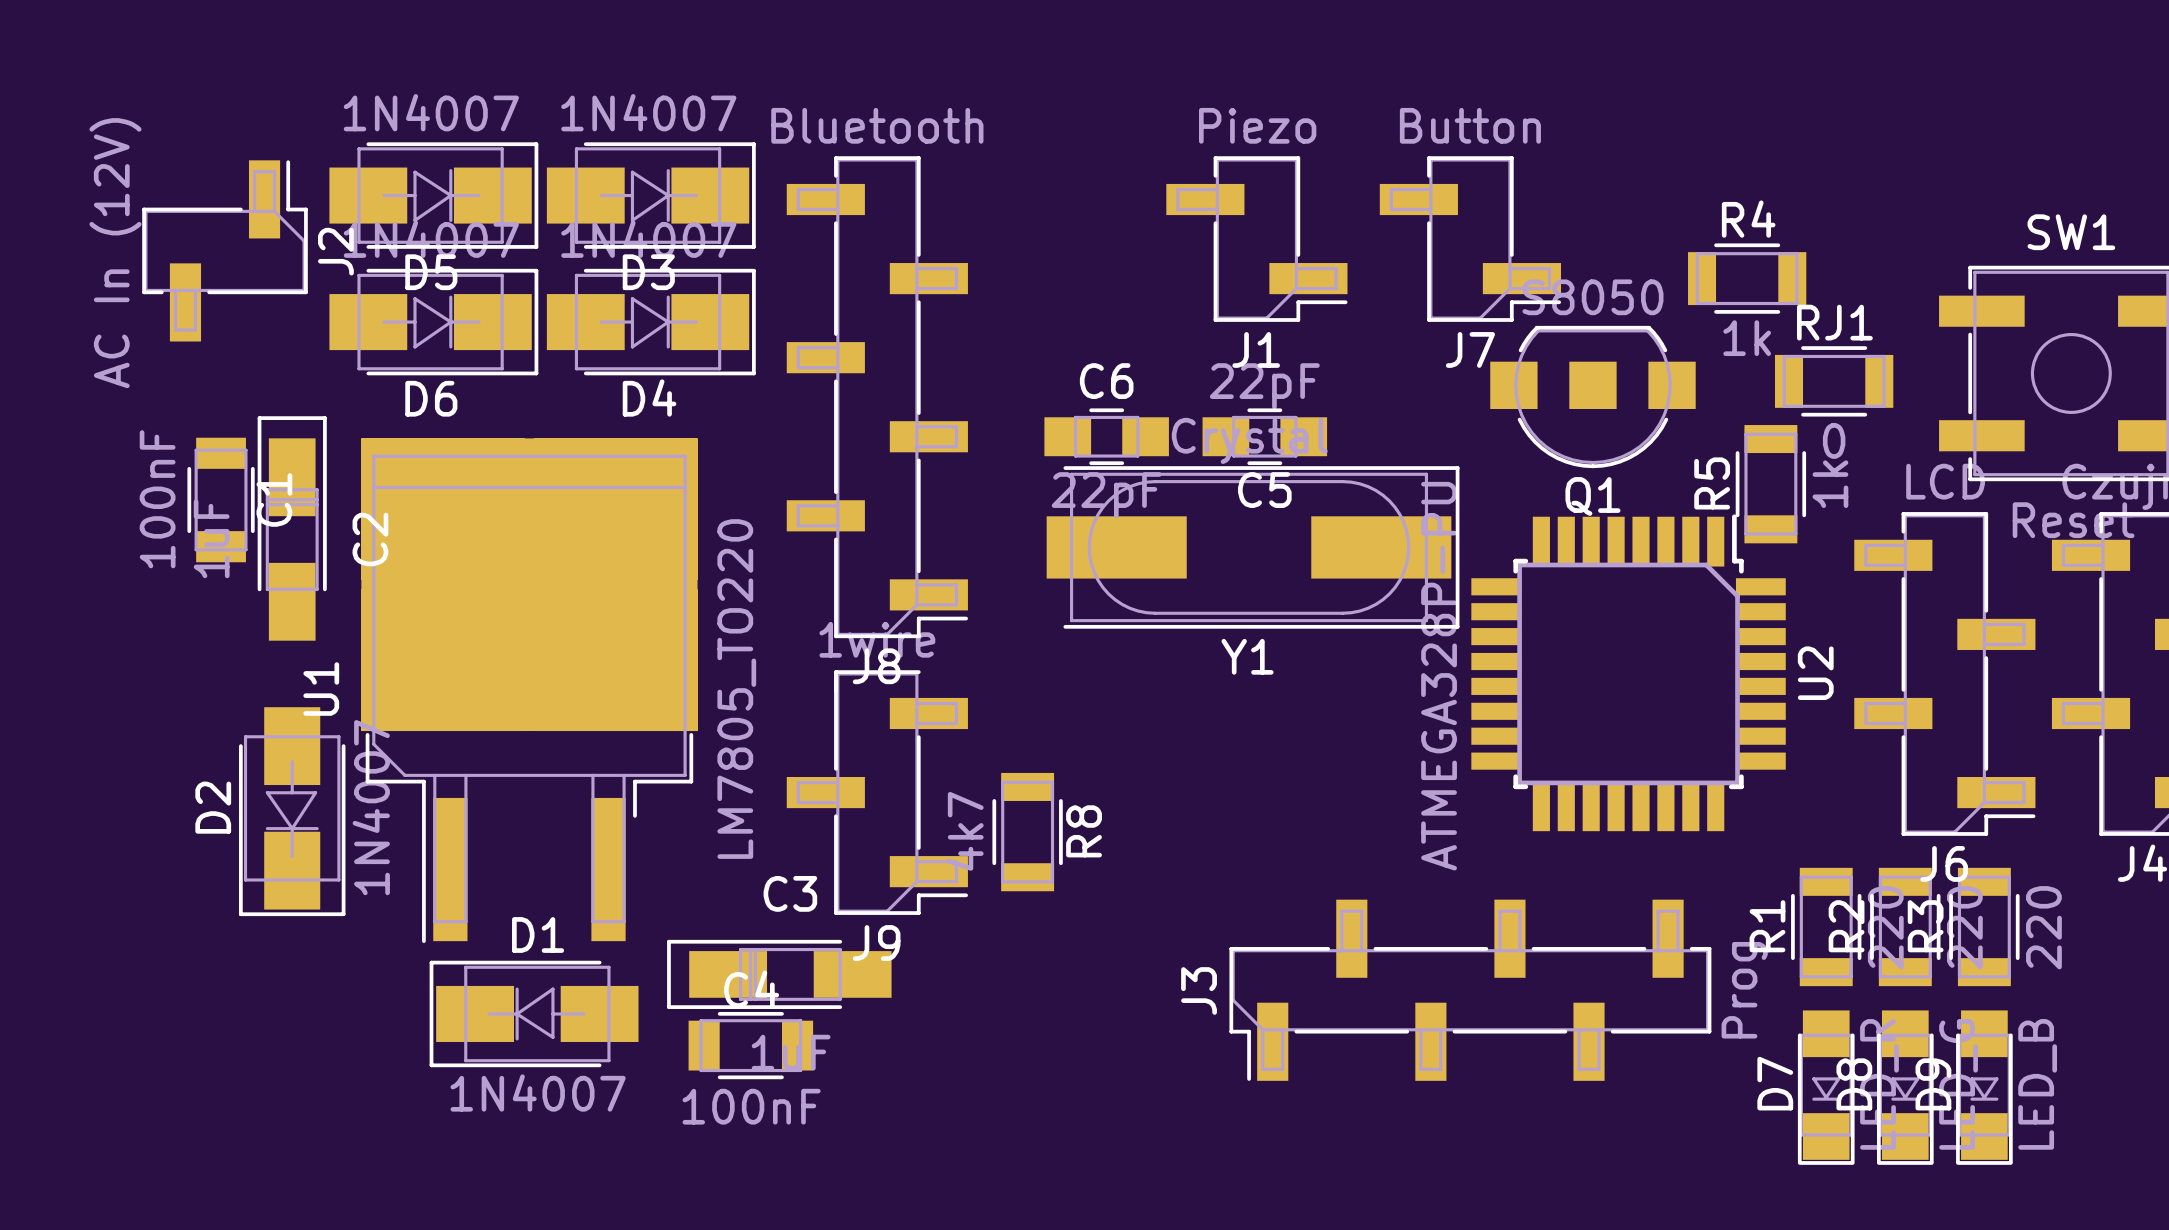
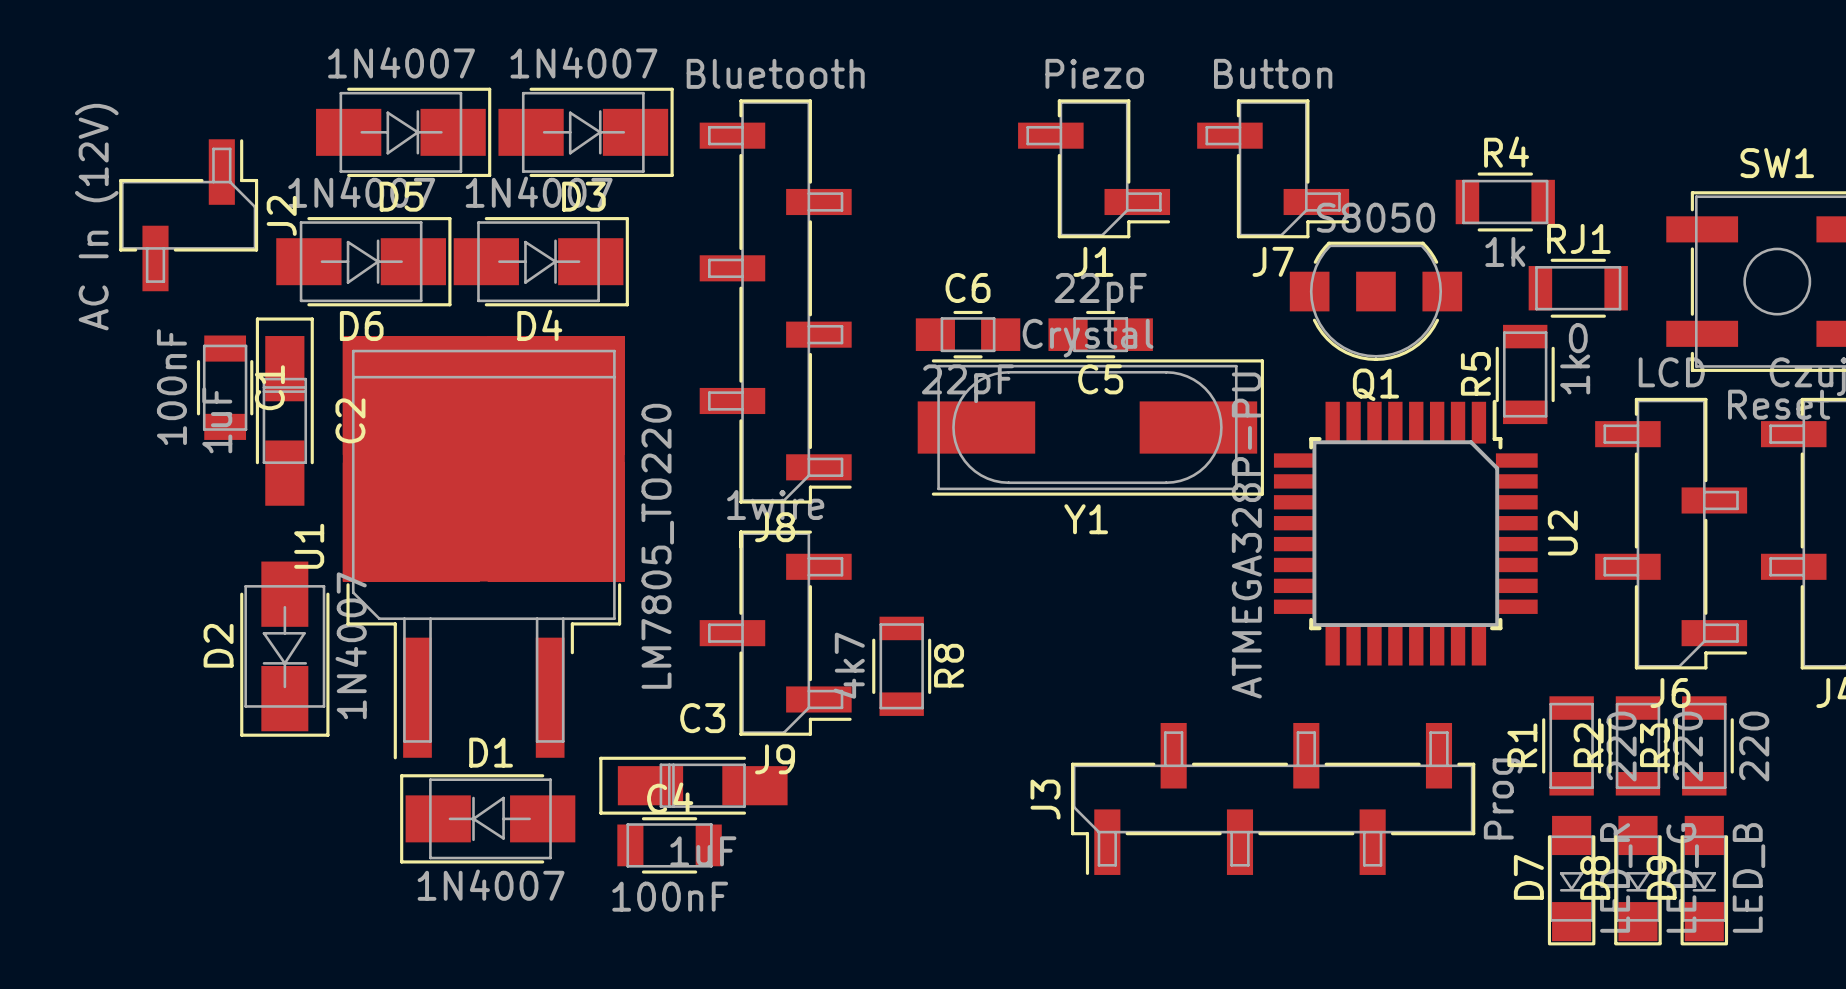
J2 position: (225, 250) -> (188, 215)
D6 position: (433, 322) -> (363, 261)
D4 position: (651, 322) -> (541, 261)

